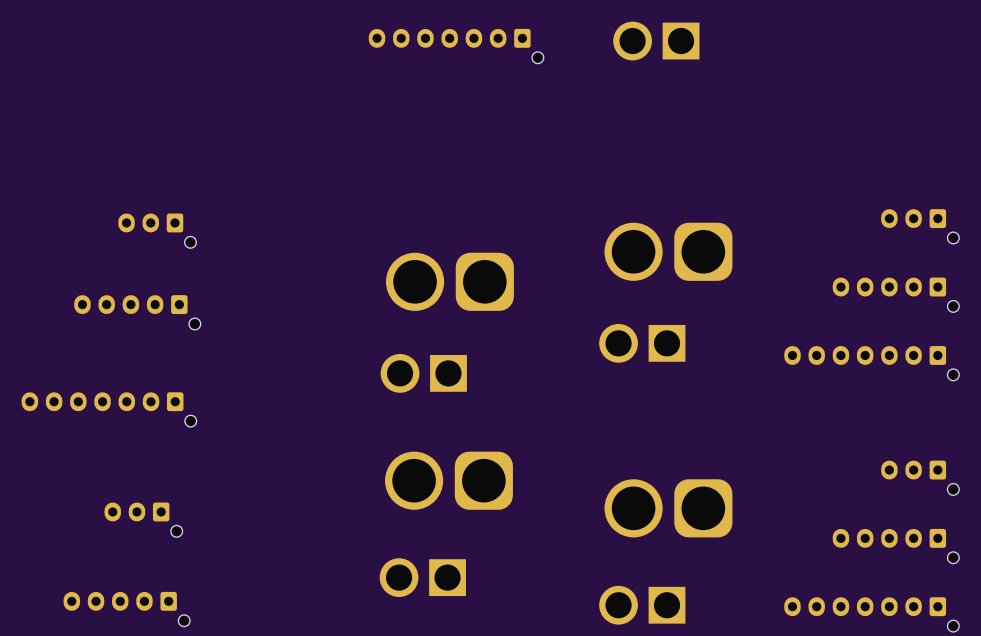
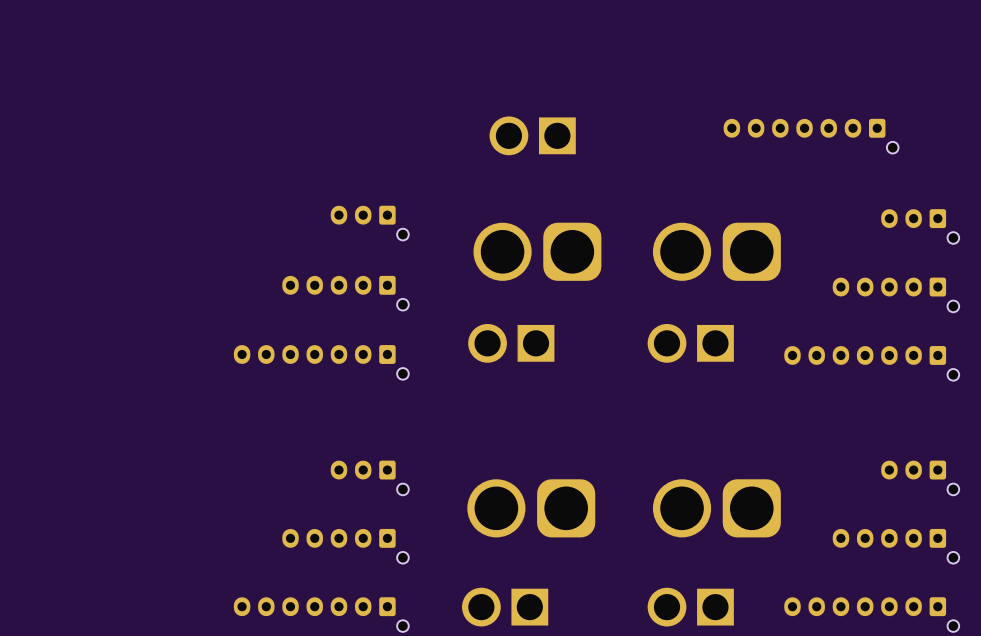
part: (656, 41) -> none
part: (456, 46) -> none
part: none -> (532, 135)
part: none -> (811, 136)
part: none -> (369, 223)
part: (157, 230) -> none
part: none -> (537, 251)
part position: (668, 251) -> (716, 251)
part: (449, 281) -> none
part: none -> (345, 293)
part: (137, 312) -> none
part: none -> (511, 343)
part position: (642, 343) -> (690, 343)
part: none -> (321, 362)
part: (423, 373) -> none
part: (109, 409) -> none
part: none -> (369, 477)
part: (448, 480) -> none
part: none -> (531, 508)
part position: (668, 508) -> (716, 508)
part: (143, 519) -> none
part: none -> (345, 546)
part: (422, 577) -> none
part position: (642, 605) -> (690, 607)
part: none -> (505, 607)
part: (126, 609) -> none
part: none -> (321, 614)

